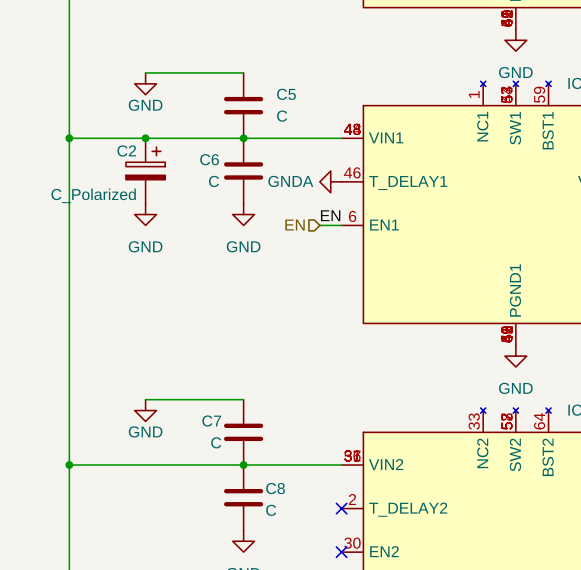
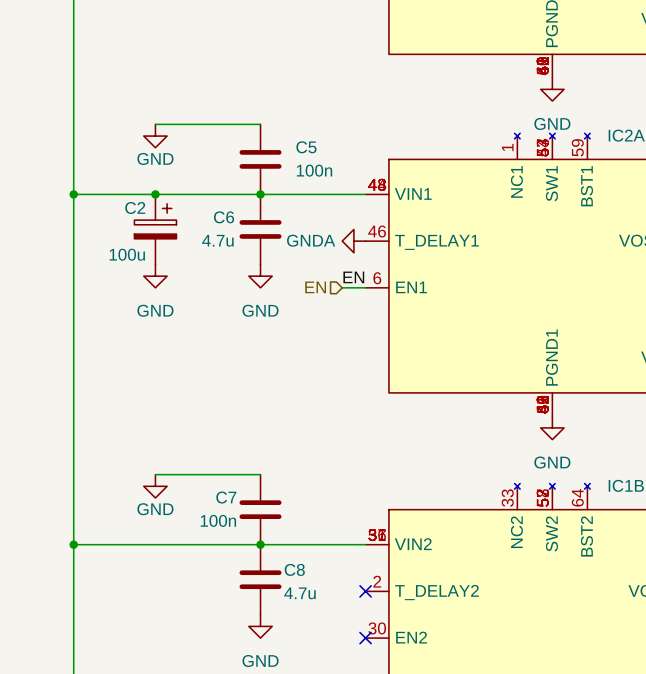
C5 value: C (282, 116) -> 100n (314, 170)
C6 value: C (214, 181) -> 4.7u (217, 240)
C2 value: C_Polarized (93, 195) -> 100u (127, 254)
C7 value: C (216, 442) -> 100n (218, 520)
C8 value: C (271, 510) -> 4.7u (300, 593)

